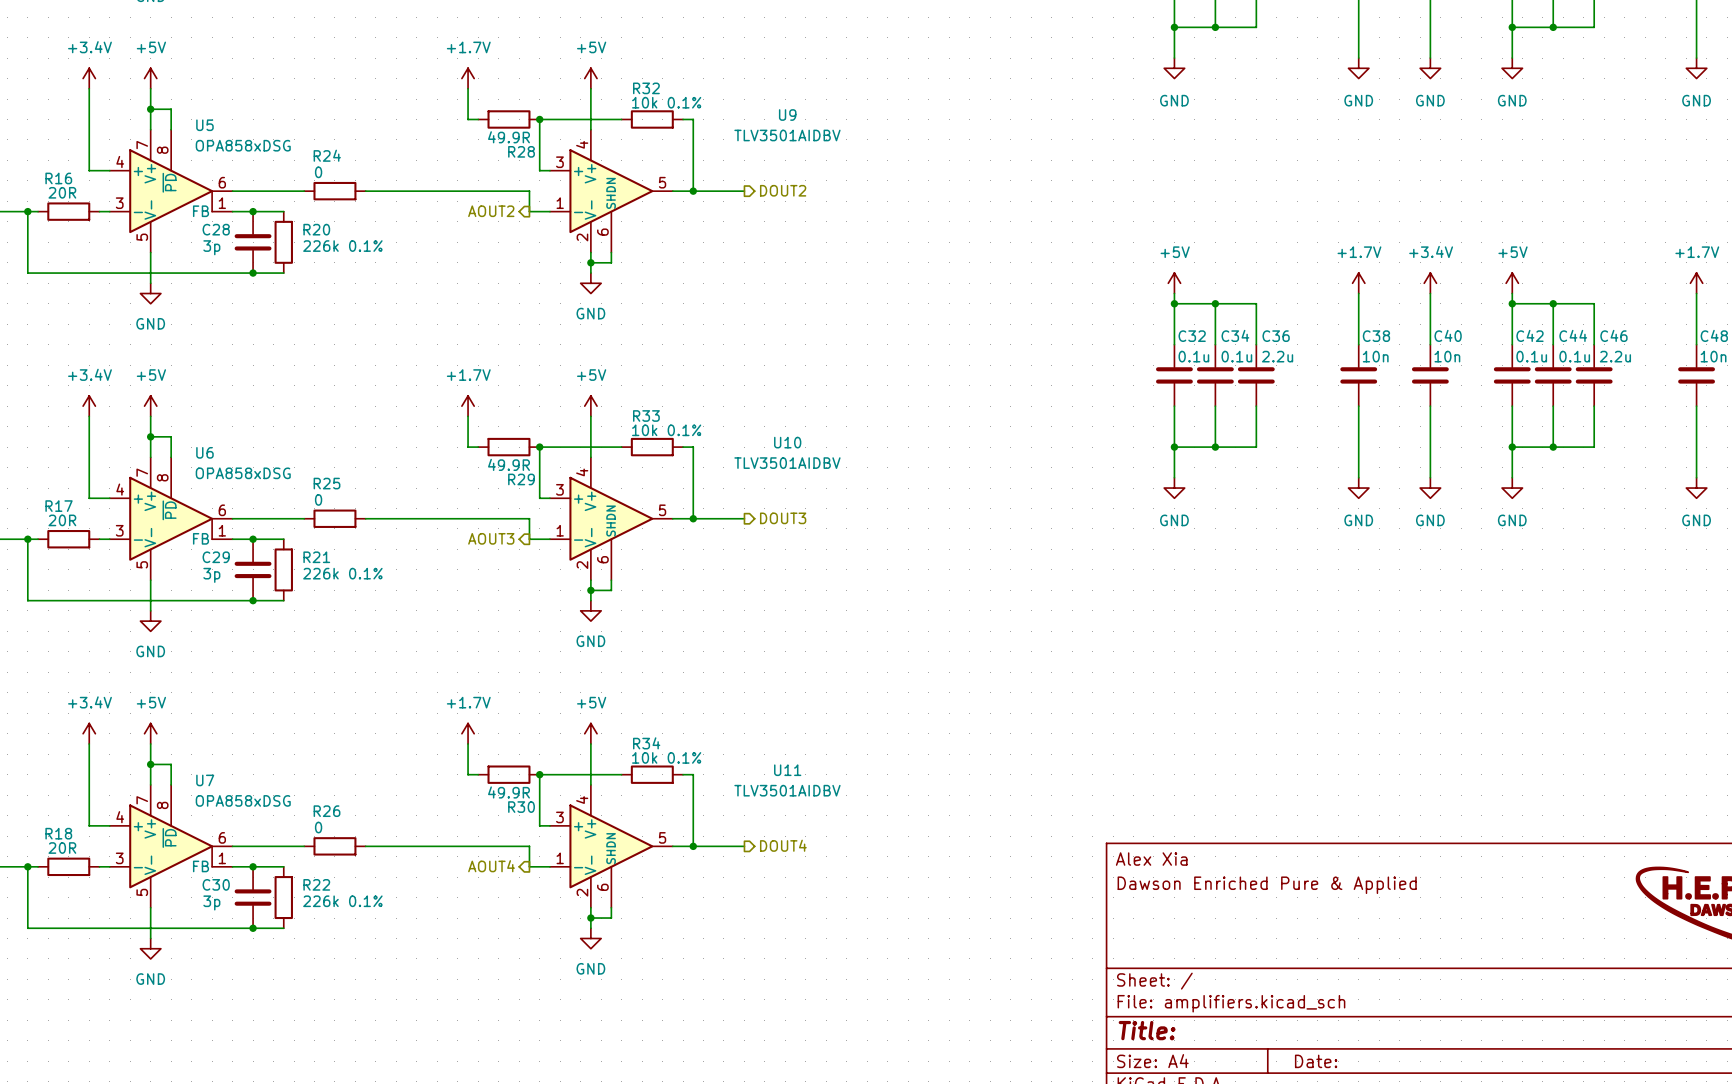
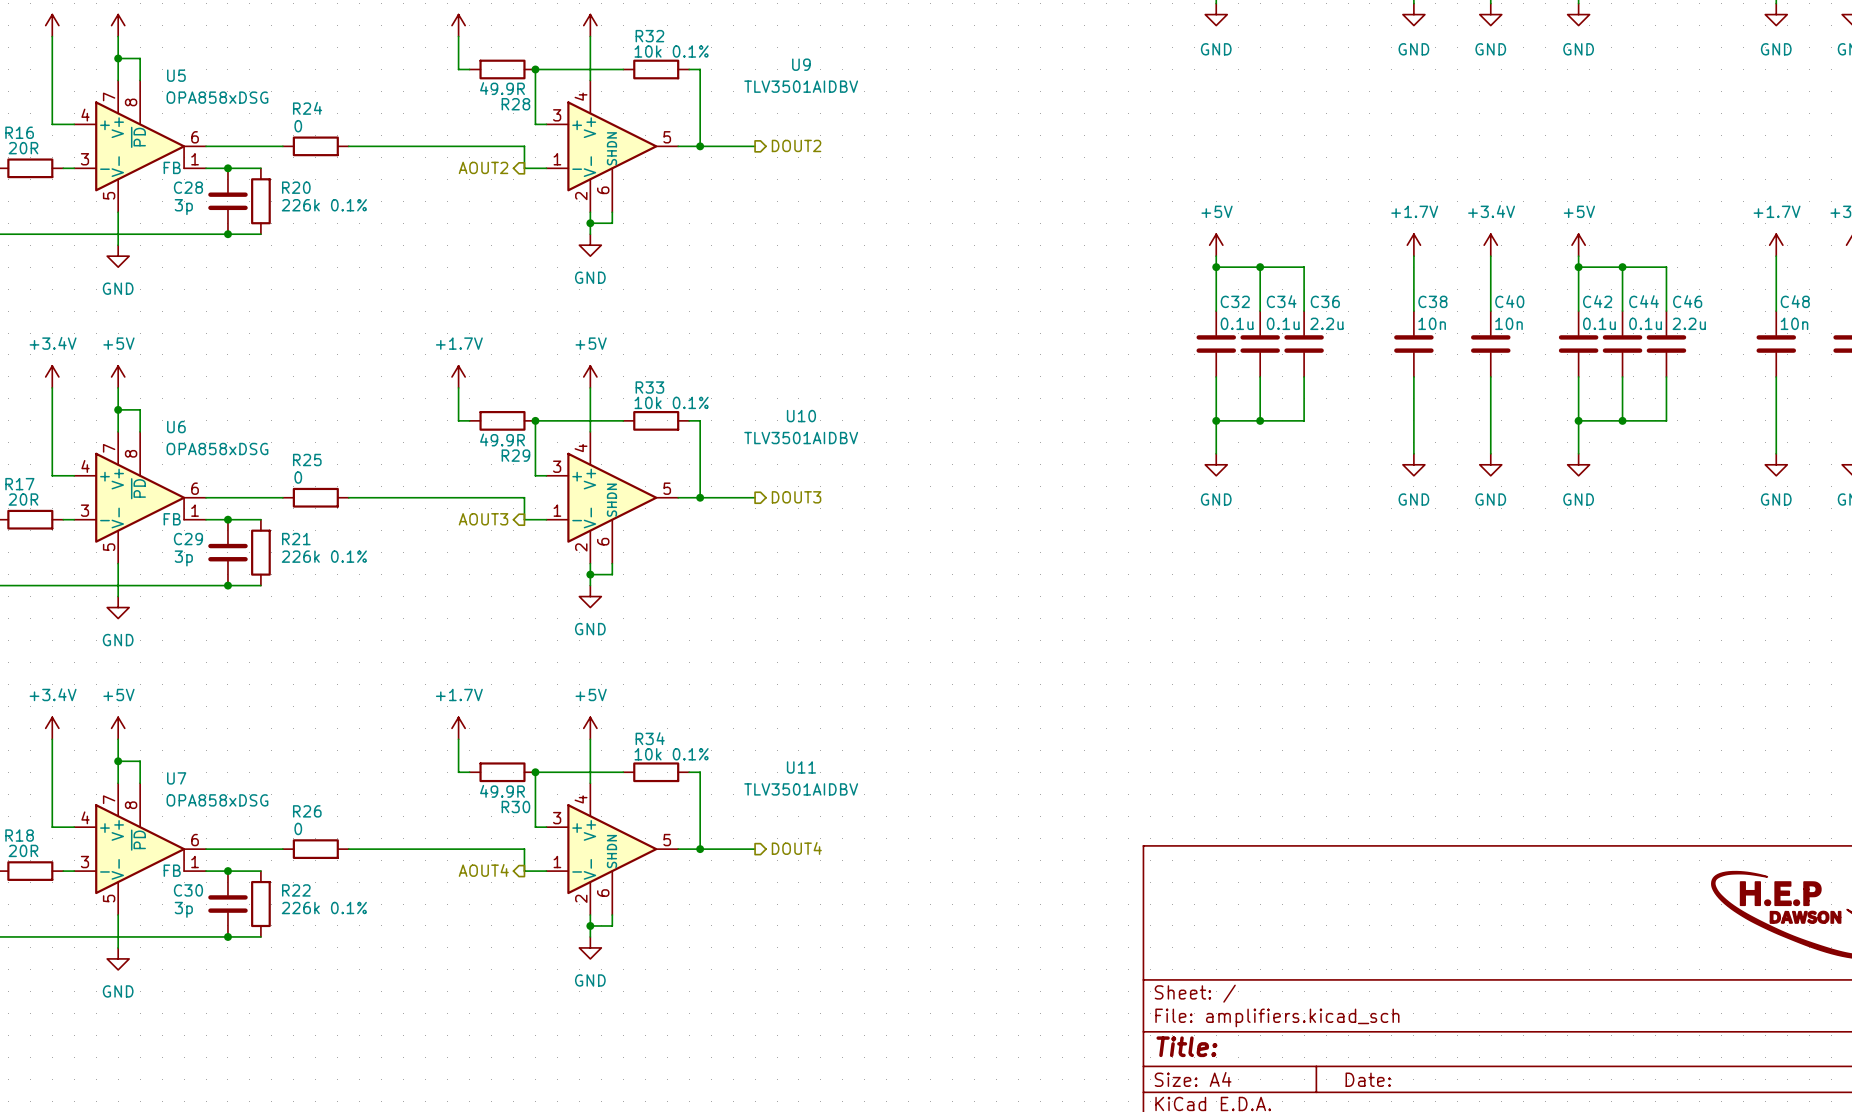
title block: Alex Xia (1151, 859) -> none
title block: Dawson Enriched Pure & Applied (1267, 885) -> none

